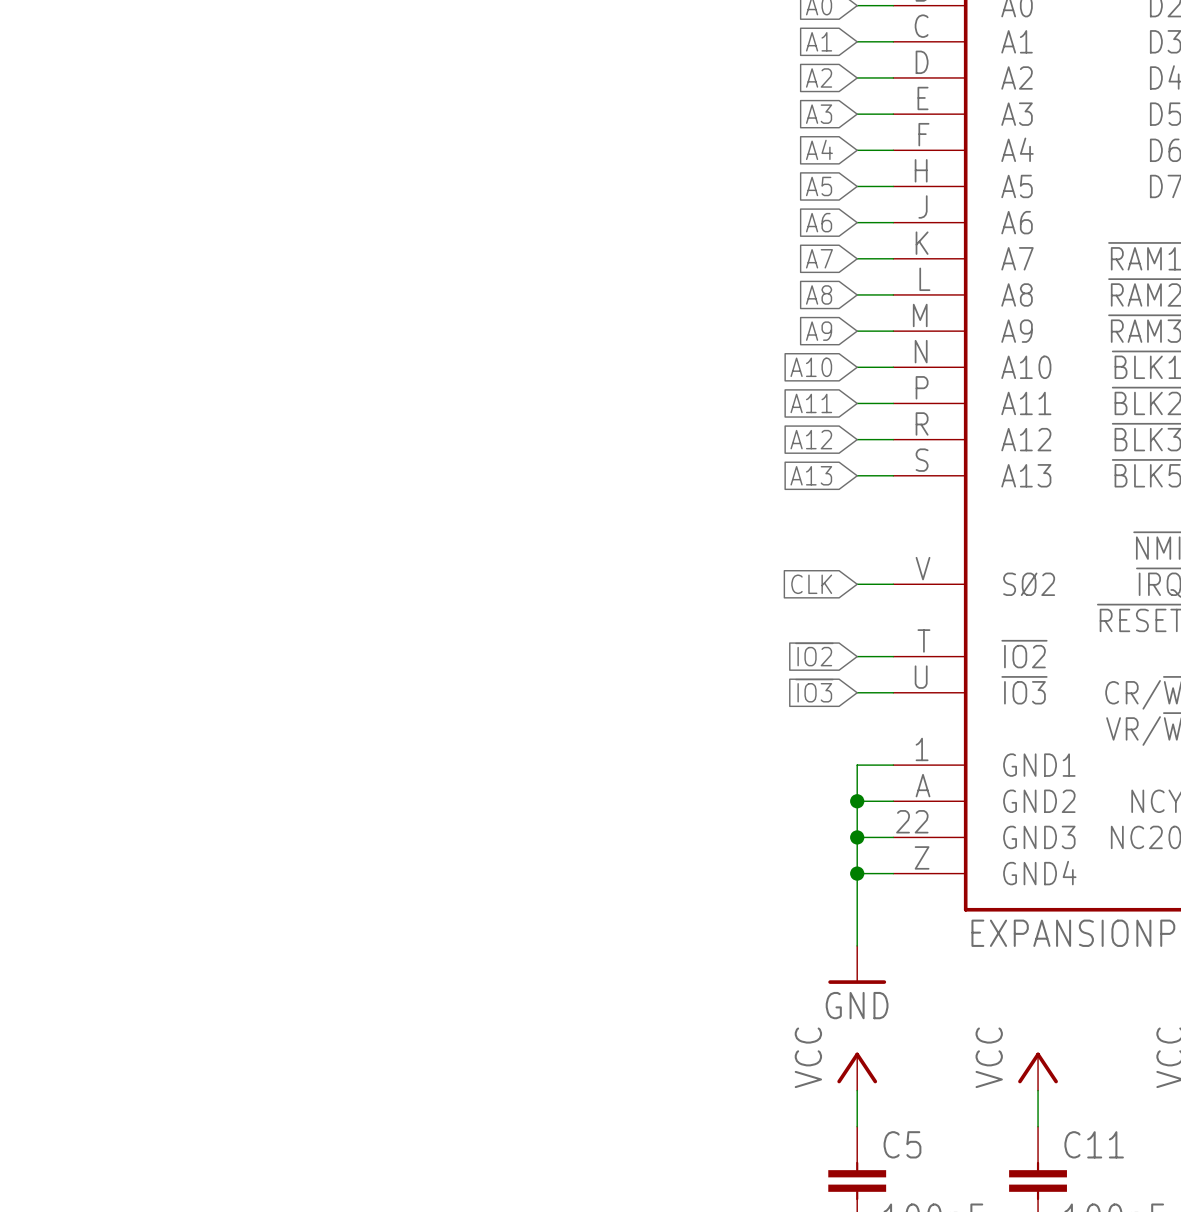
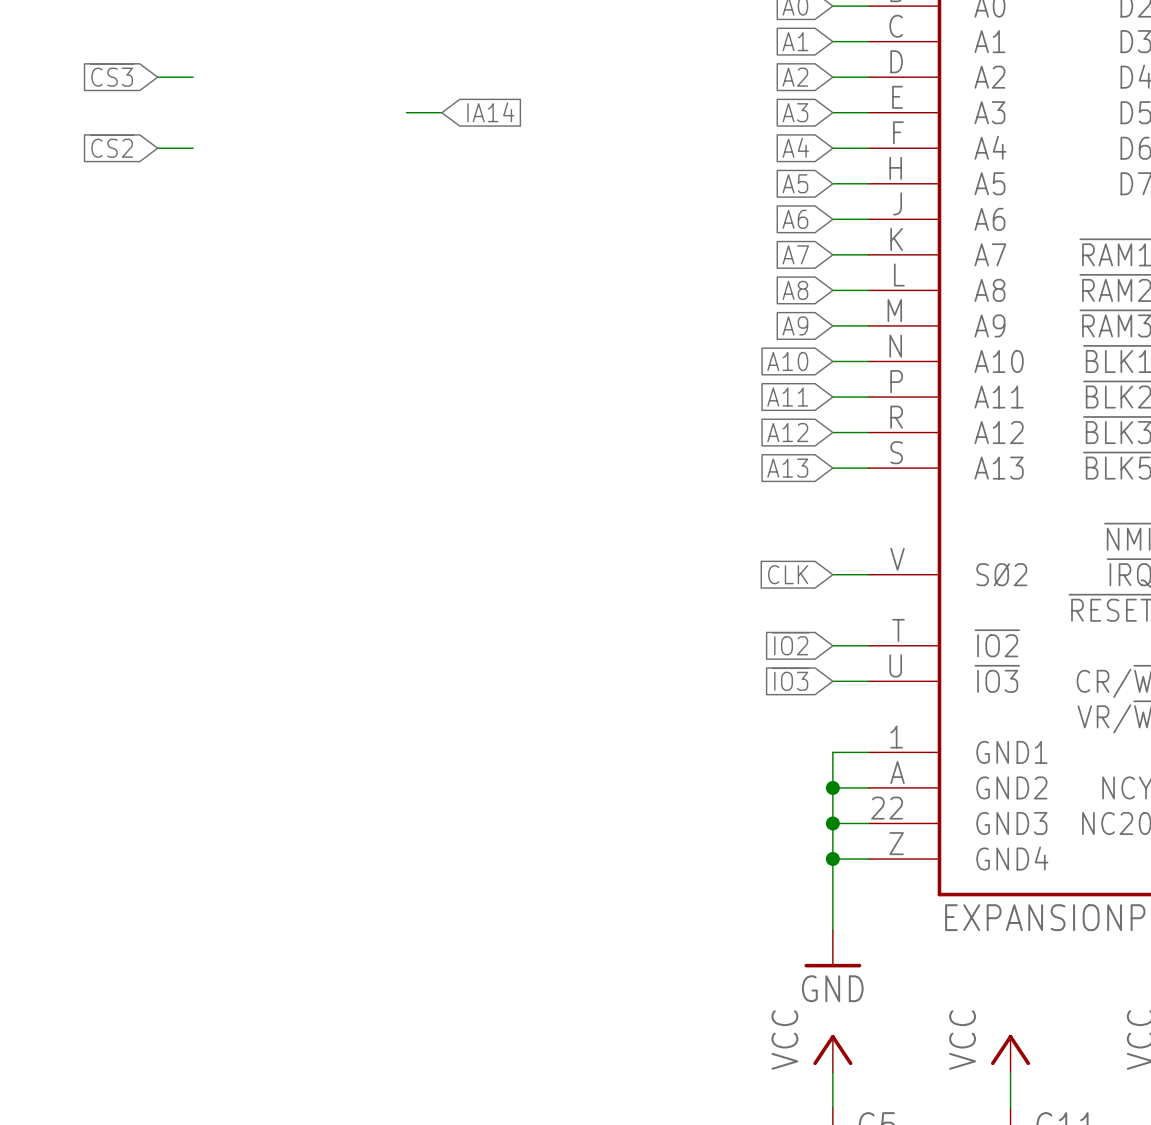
global label: none -> ~{CS3} (112, 75)
wire: none -> (157, 77) (193, 77)
global label: none -> IA14 (490, 112)
wire: none -> (406, 112) (441, 112)
global label: none -> ~{CS2} (112, 146)
wire: none -> (157, 148) (193, 148)

